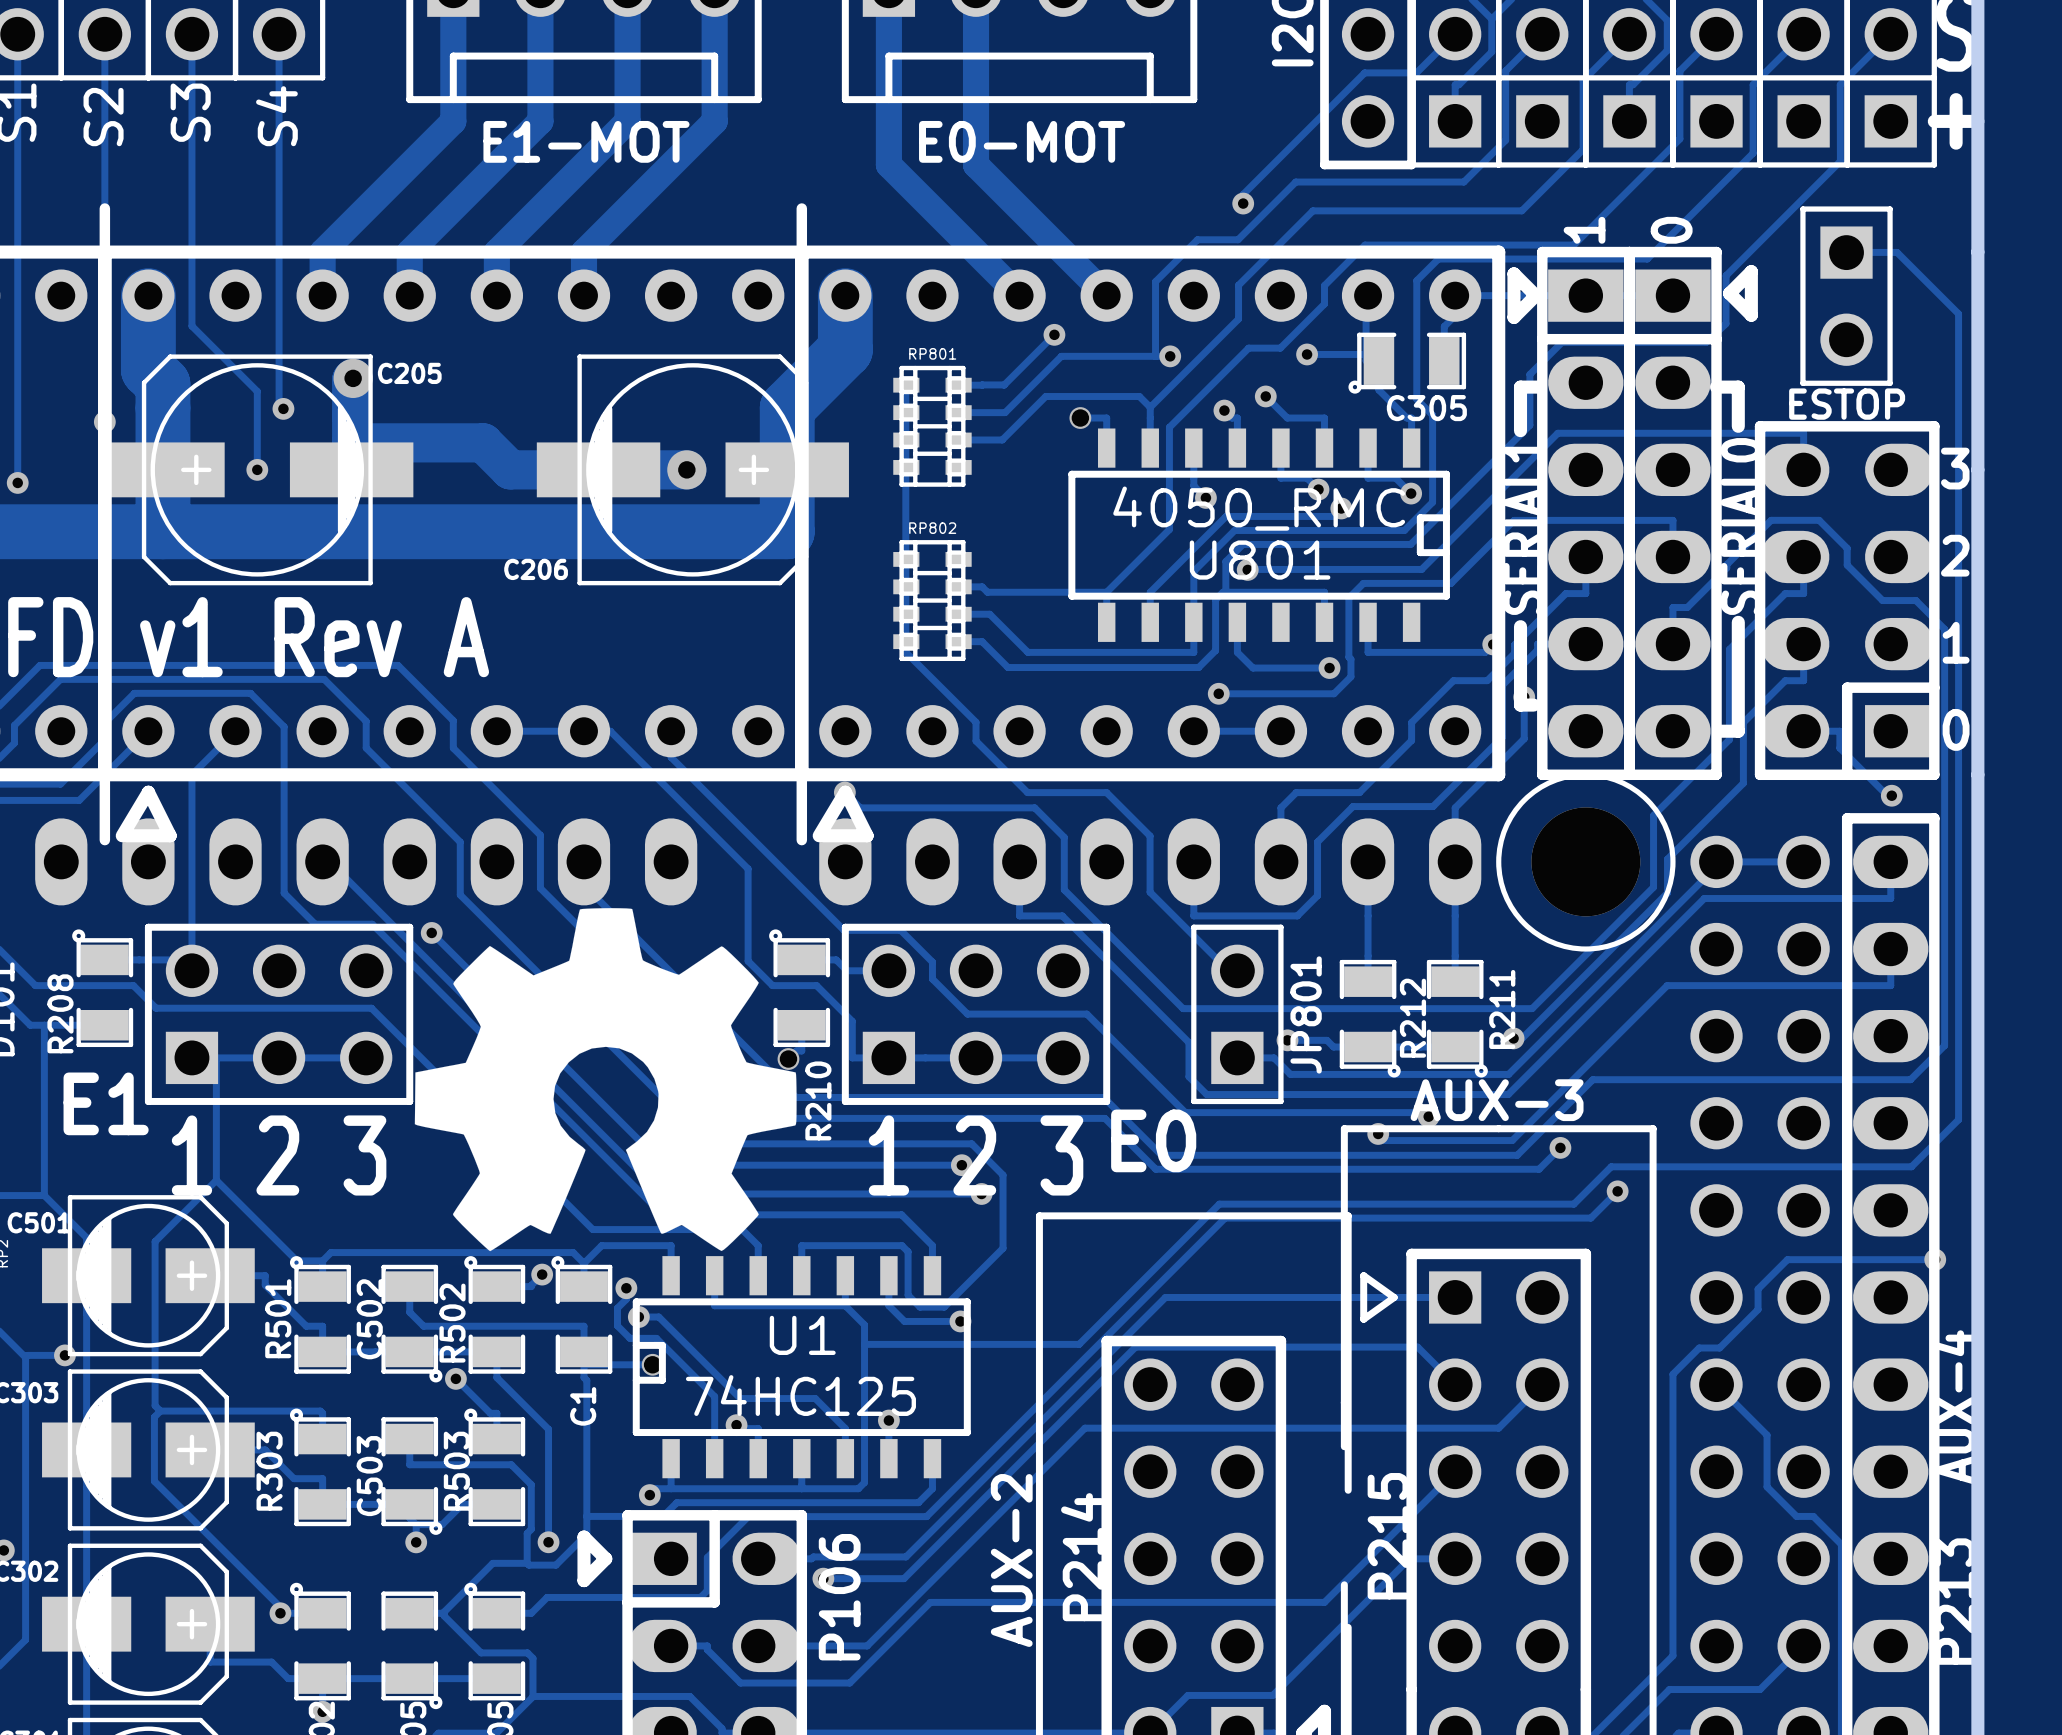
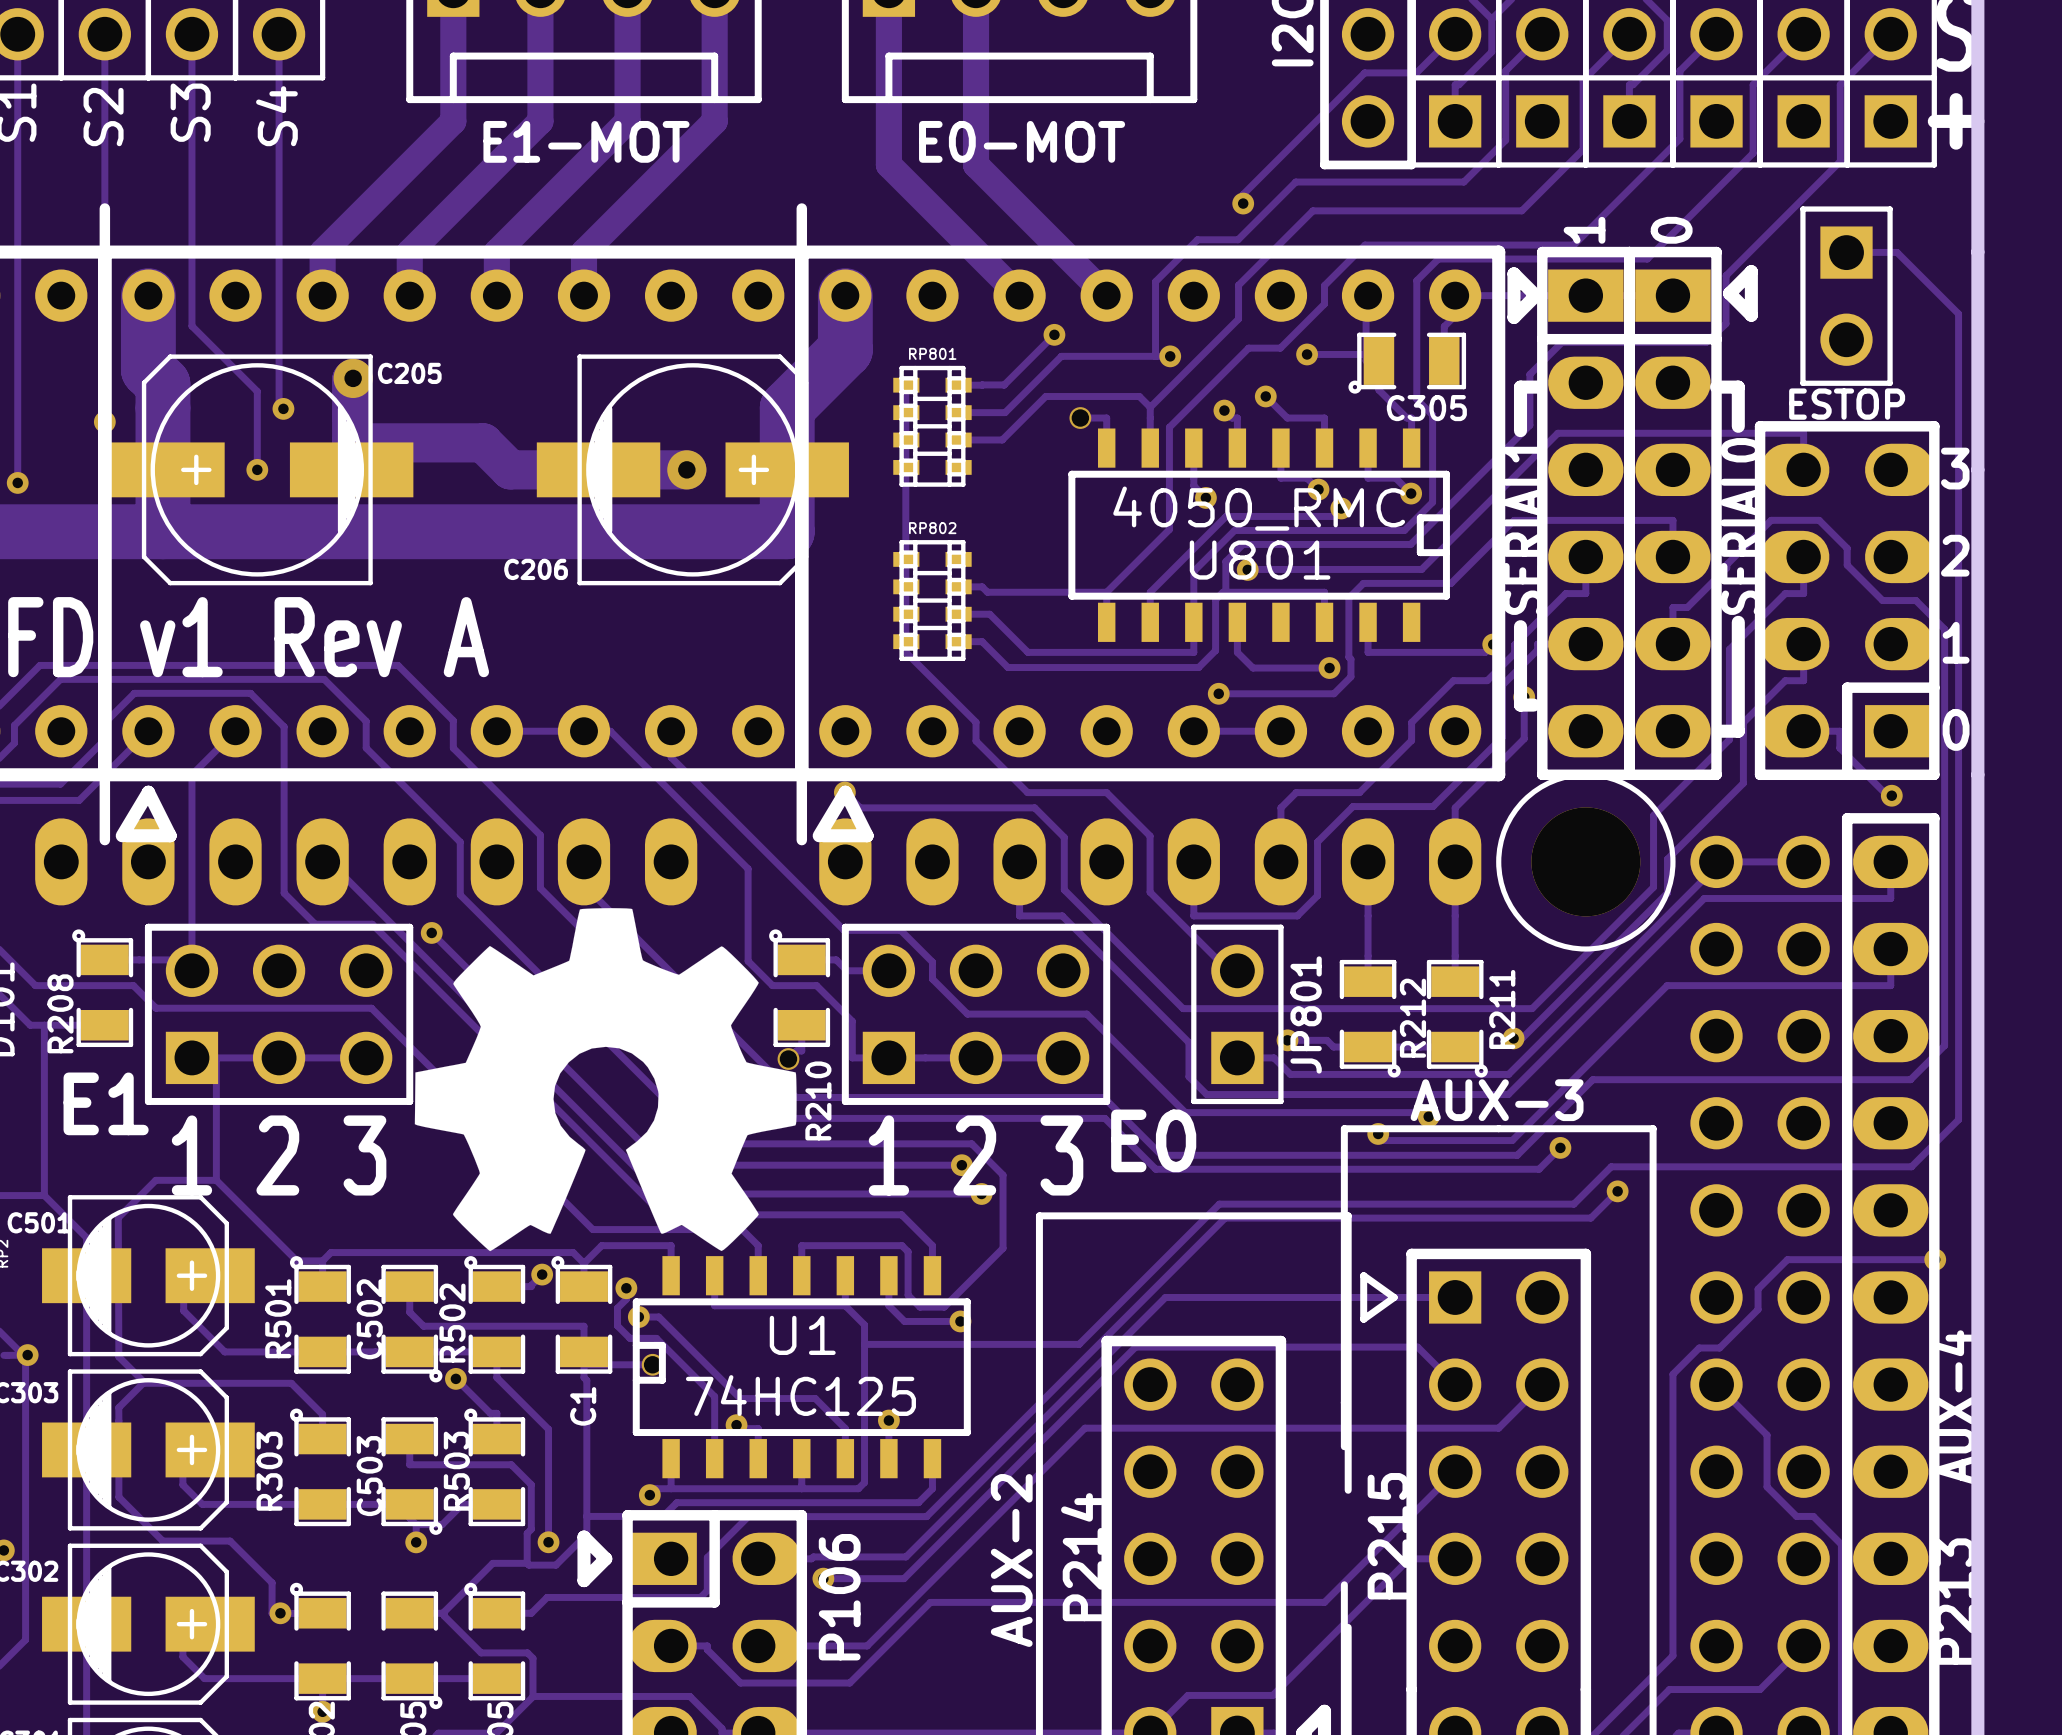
track: (216, 1180) (155, 1241) (155, 1405) (160, 1411) -> none
track: (210, 1275) (265, 1275) (265, 1285) (306, 1326) (322, 1326) (322, 1351) -> (183, 1275) (183, 1310) (224, 1351) (322, 1351)
track: none -> (27, 1355) (3, 1355)
track: (64, 1355) (27, 1355) (25, 1357) -> none
via position: (64, 1355) -> (27, 1355)
track: (160, 1411) (320, 1411) (322, 1414) -> (143, 1383) (291, 1383) (322, 1414)
track: (160, 1411) (154, 1417) (154, 1481) (280, 1607) (280, 1613) (322, 1613) -> (216, 1180) (155, 1180) (118, 1217) (118, 1356) (144, 1382) (118, 1407) (118, 1497) (162, 1541) (230, 1541) (272, 1582) (272, 1613) (322, 1613)
track: (210, 1449) (265, 1449) (293, 1478) (322, 1478) (322, 1504) -> (182, 1449) (182, 1484) (202, 1504) (322, 1504)
track: (210, 1624) (210, 1662) (271, 1662) (288, 1678) -> (182, 1621) (182, 1656) (204, 1678) (288, 1678)

